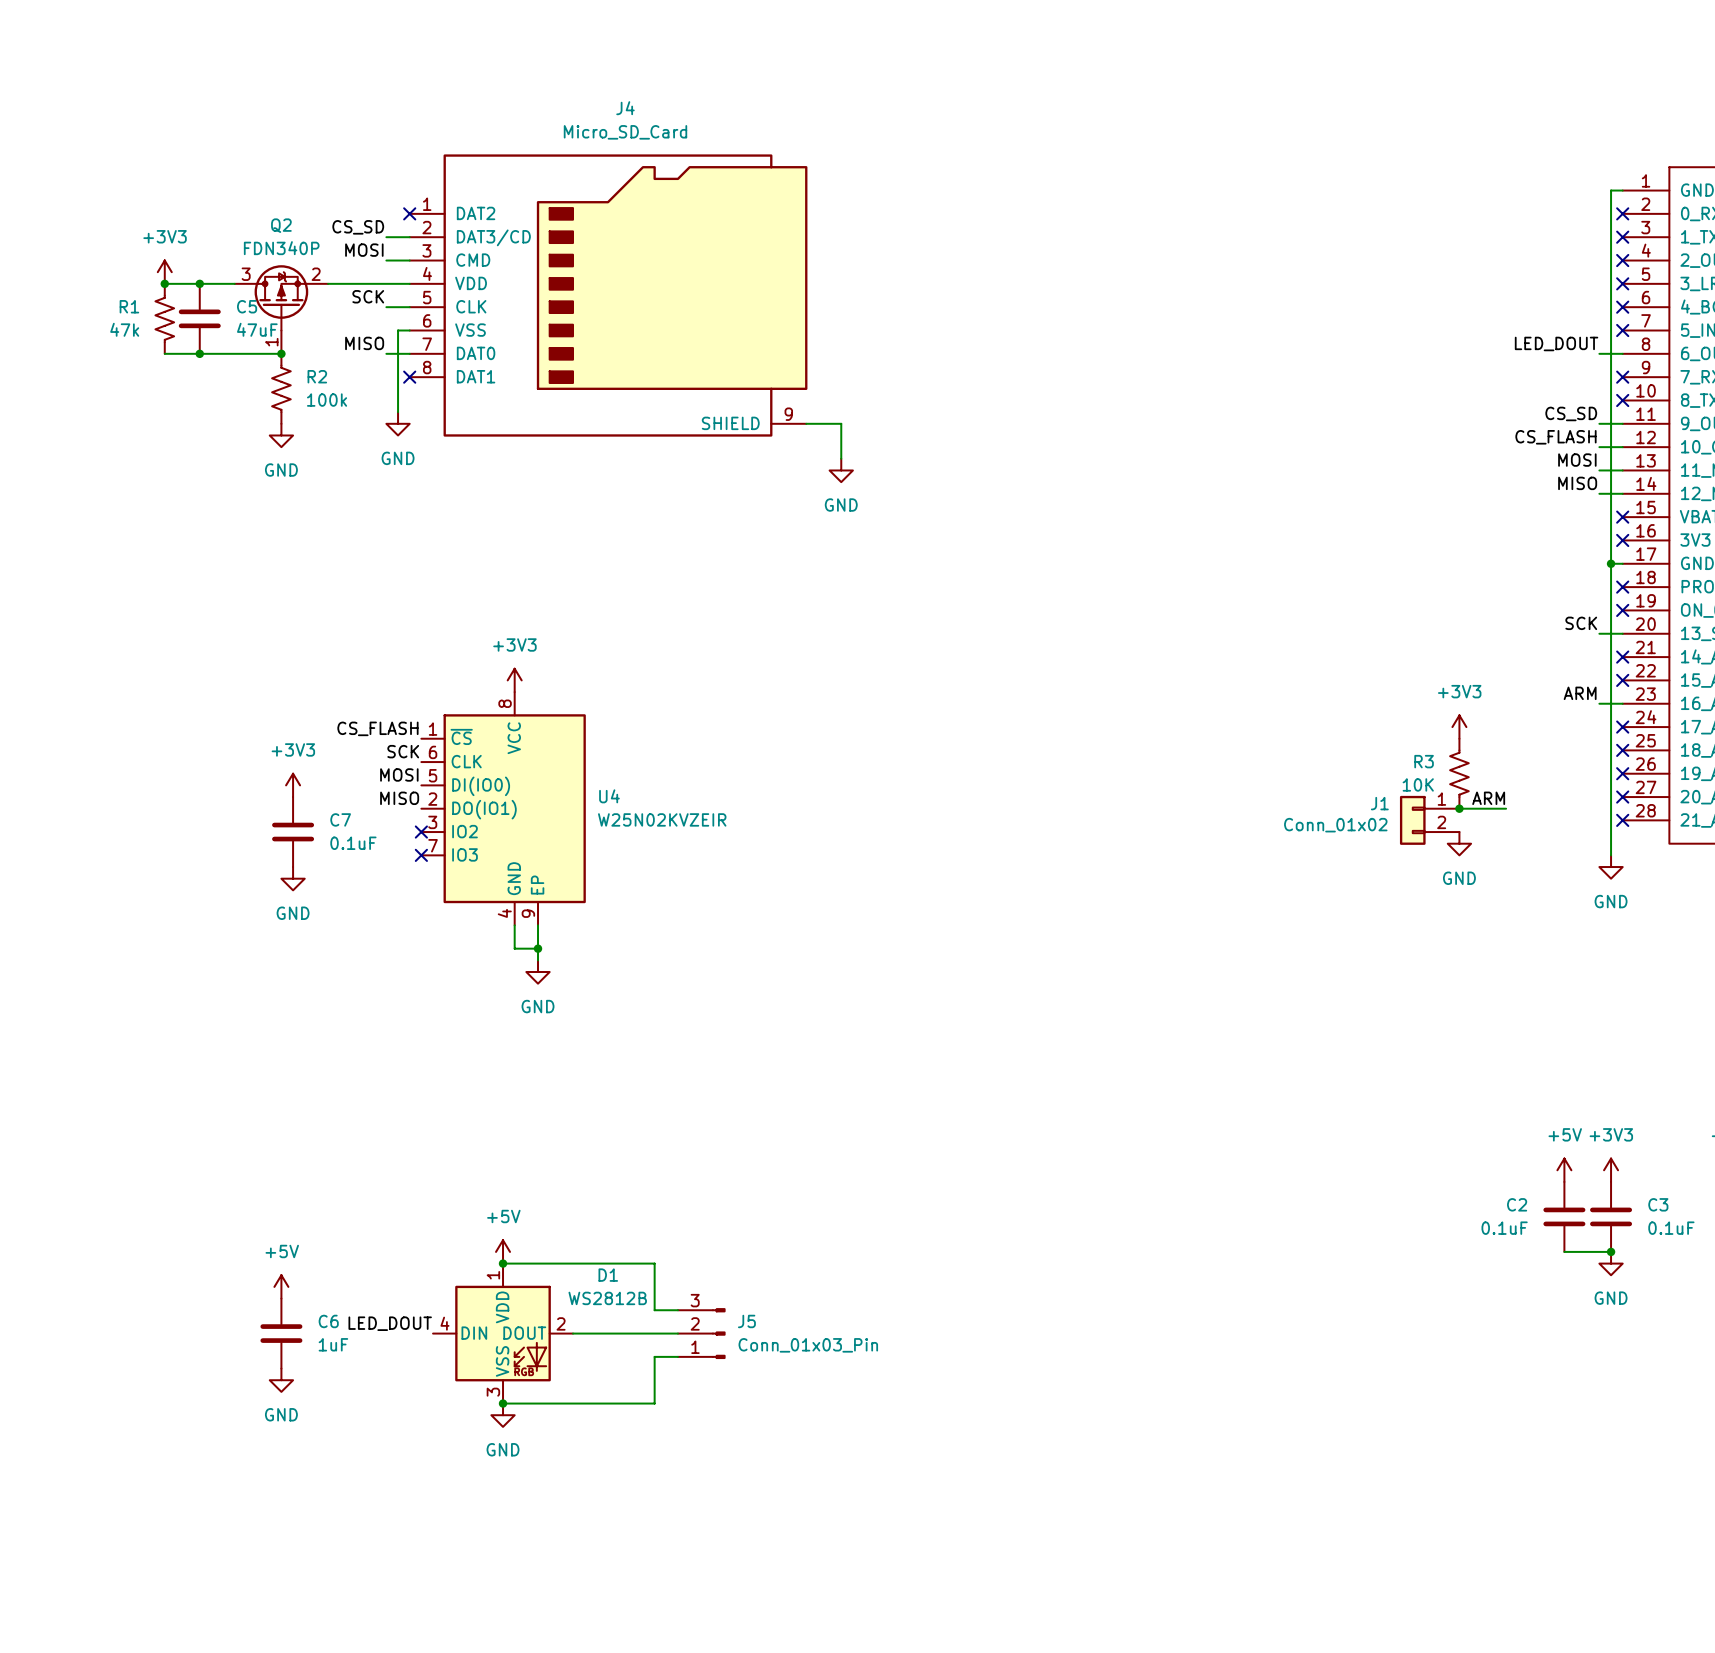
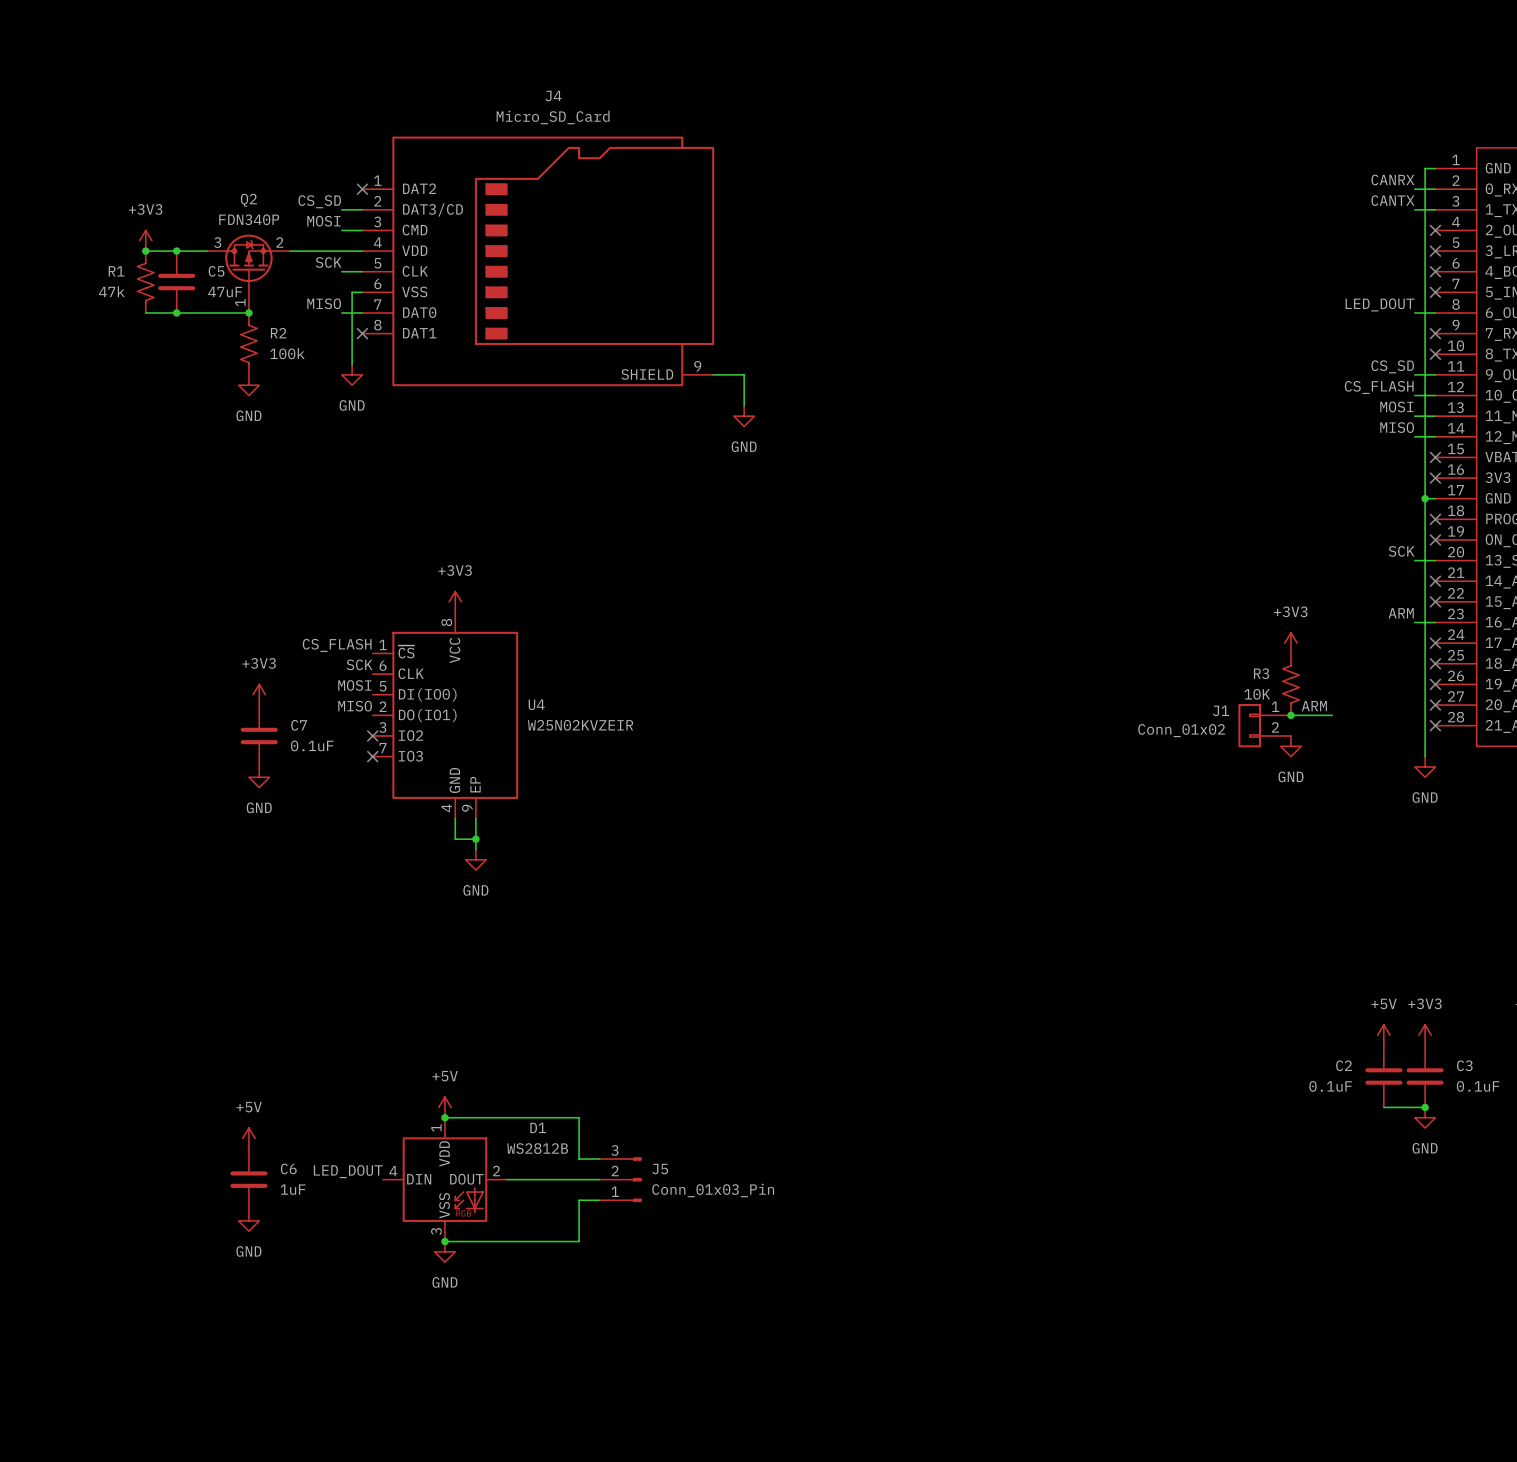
label: none -> CANRX (1392, 179)
wire: none -> (1414, 189) (1435, 189)
no-connect mark: (1622, 213) -> none
label: none -> CANTX (1392, 200)
wire: none -> (1414, 209) (1435, 209)
no-connect mark: (1622, 237) -> none

